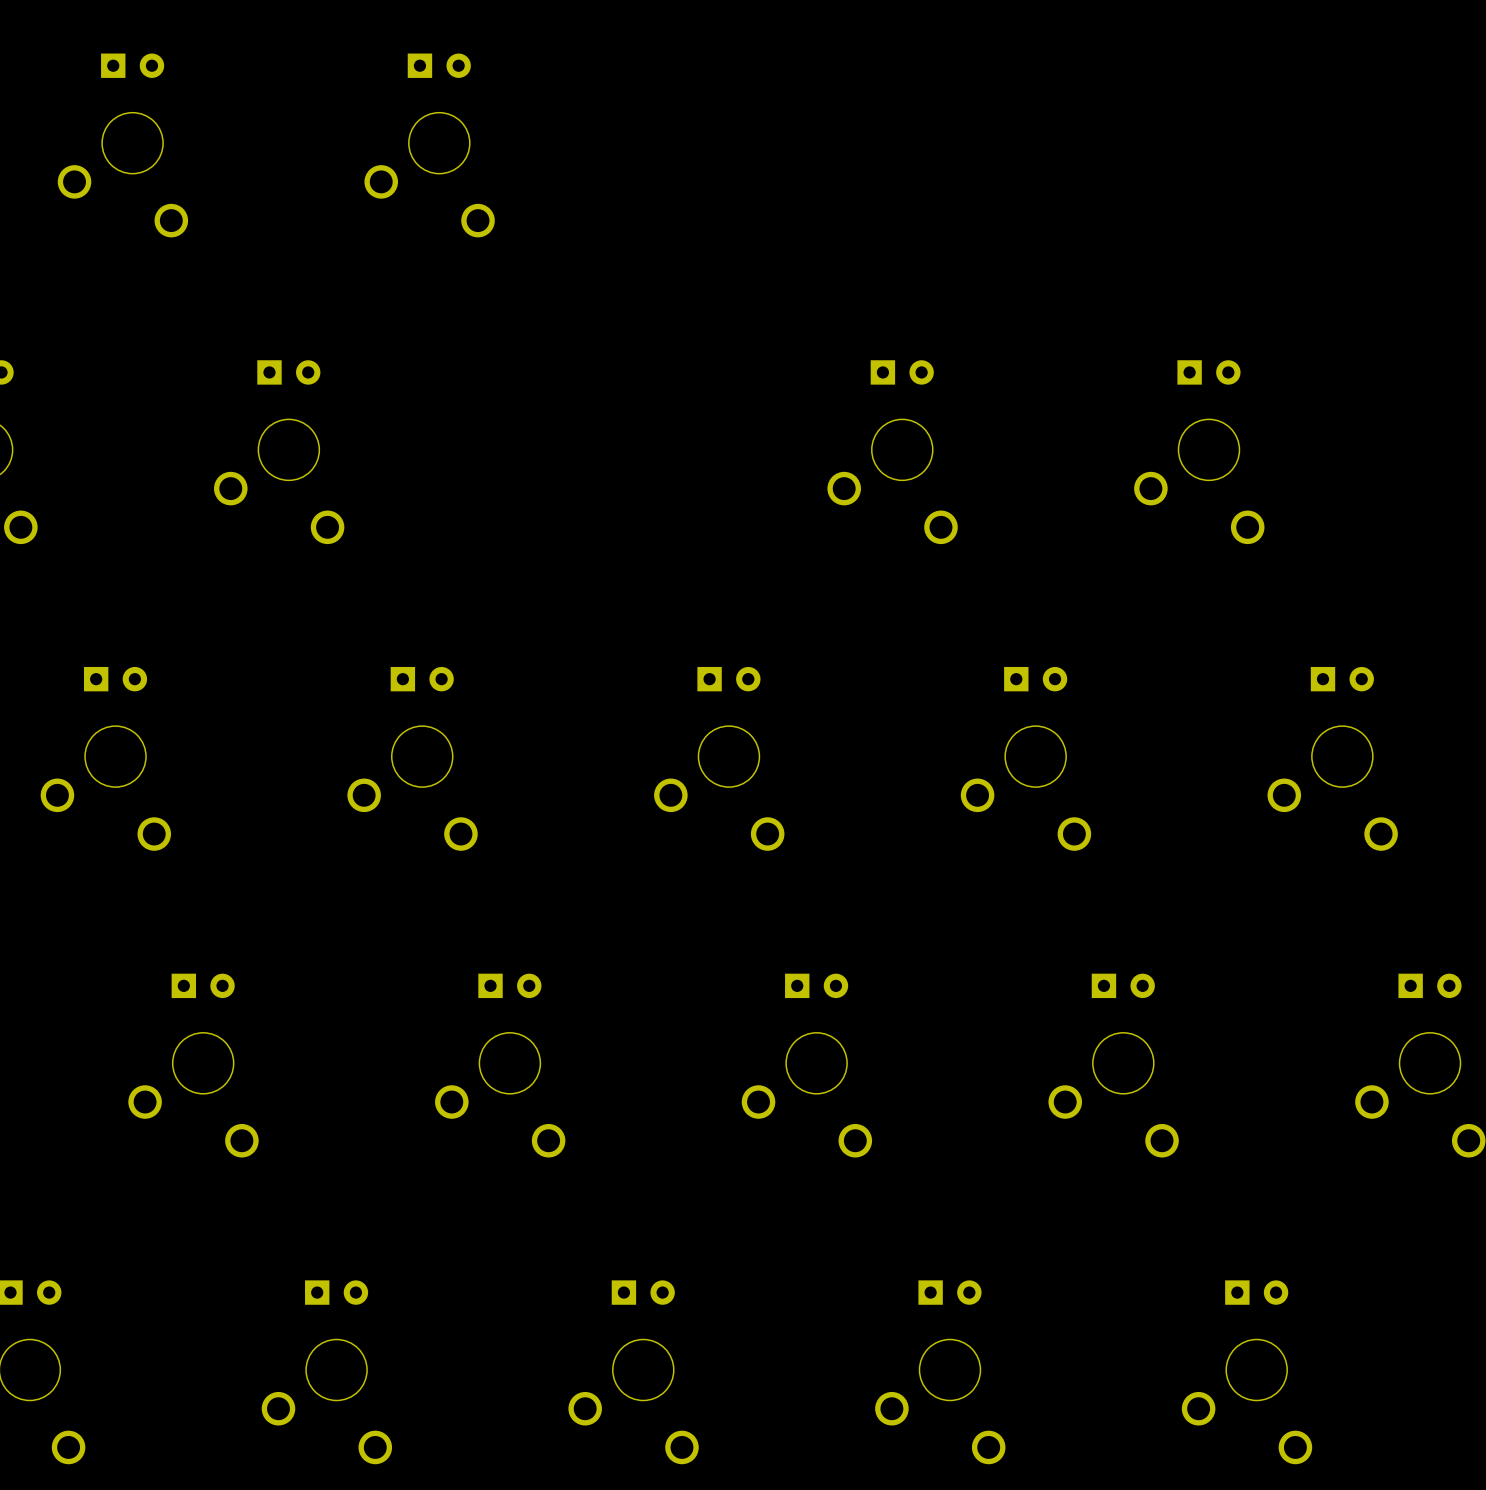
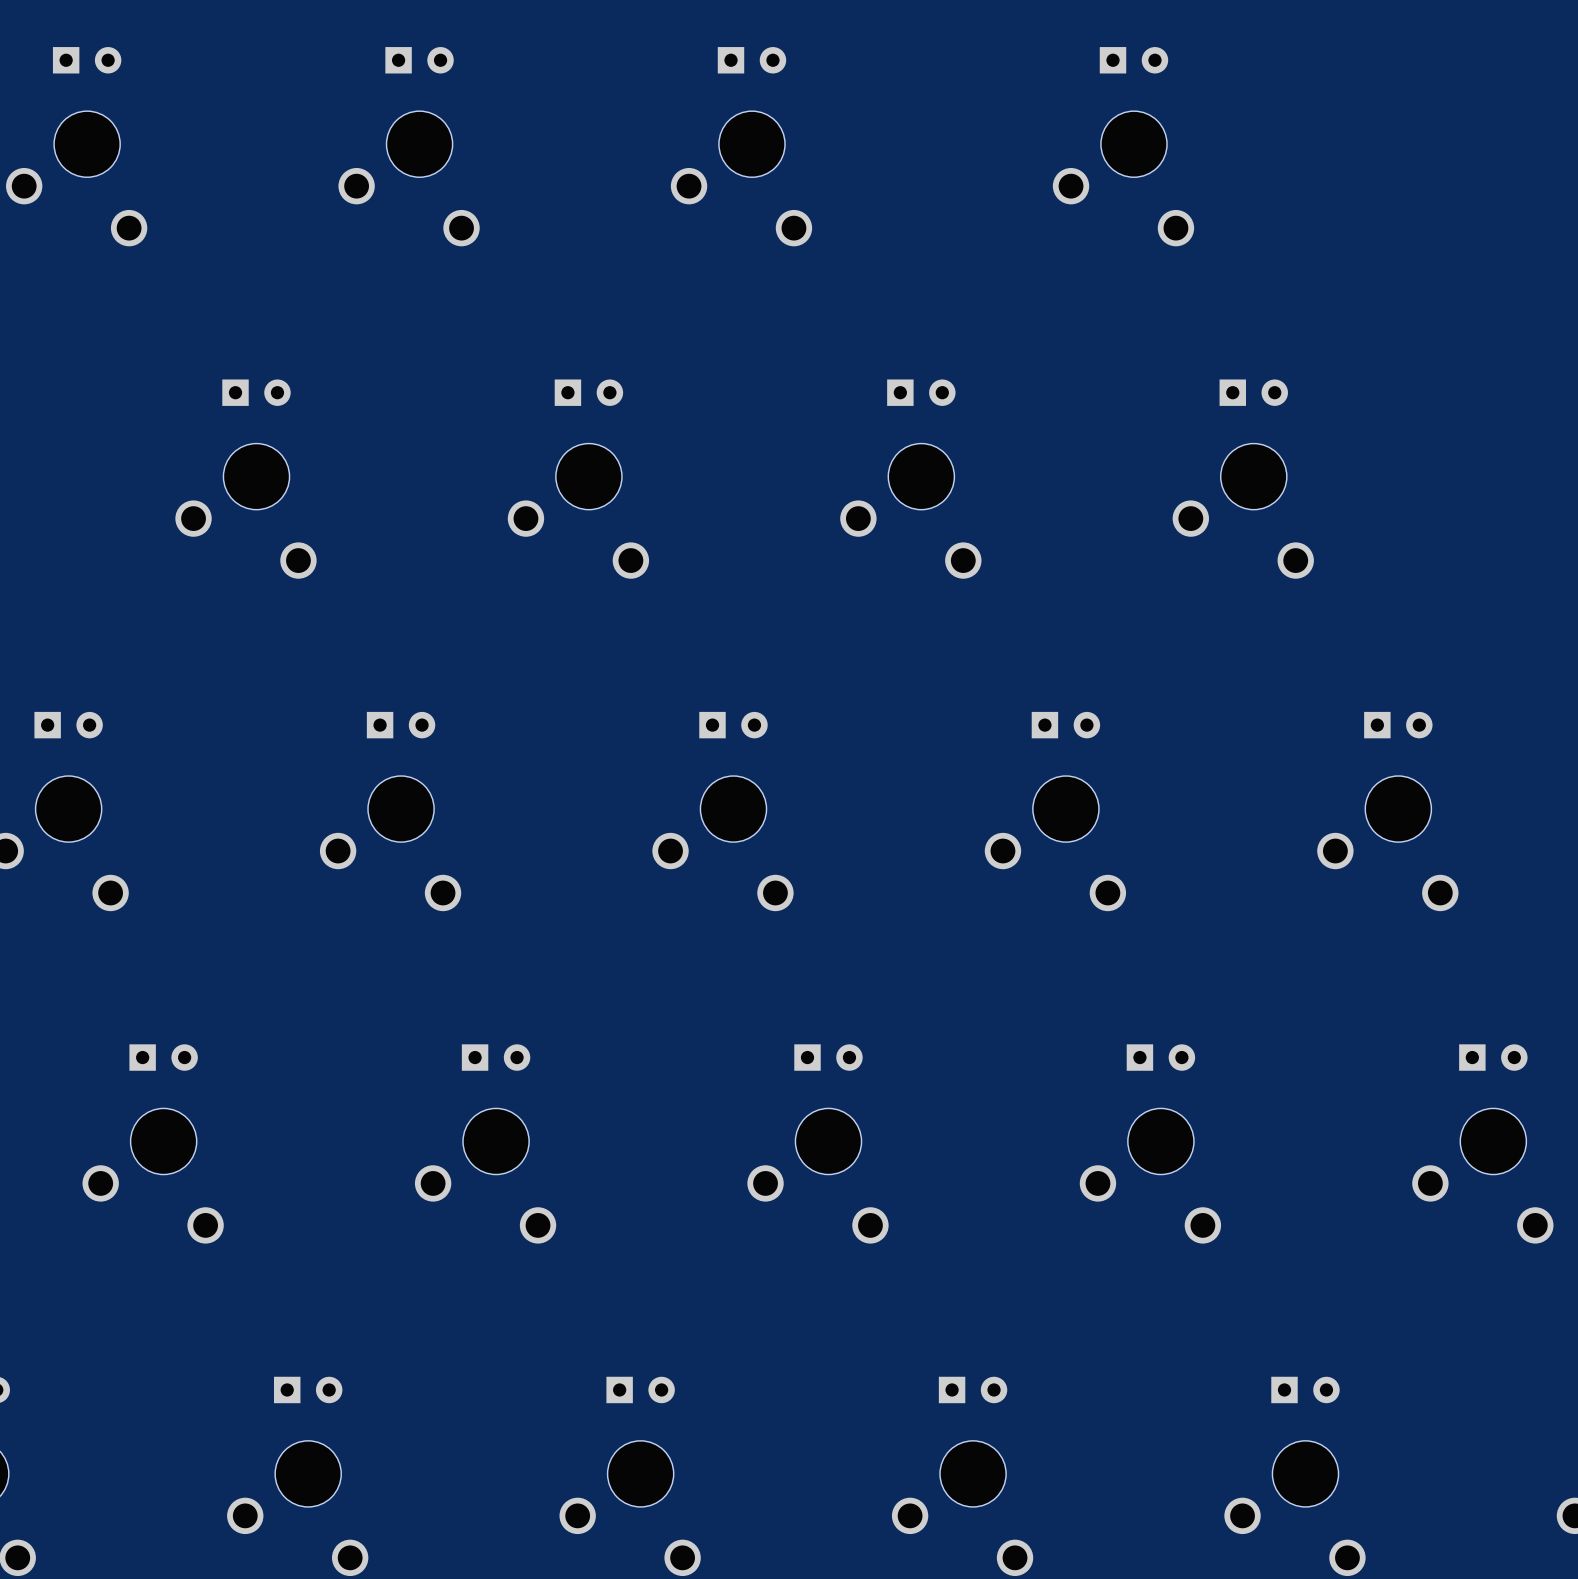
part: none -> (741, 146)
part: none -> (1123, 146)
part: none -> (578, 479)

